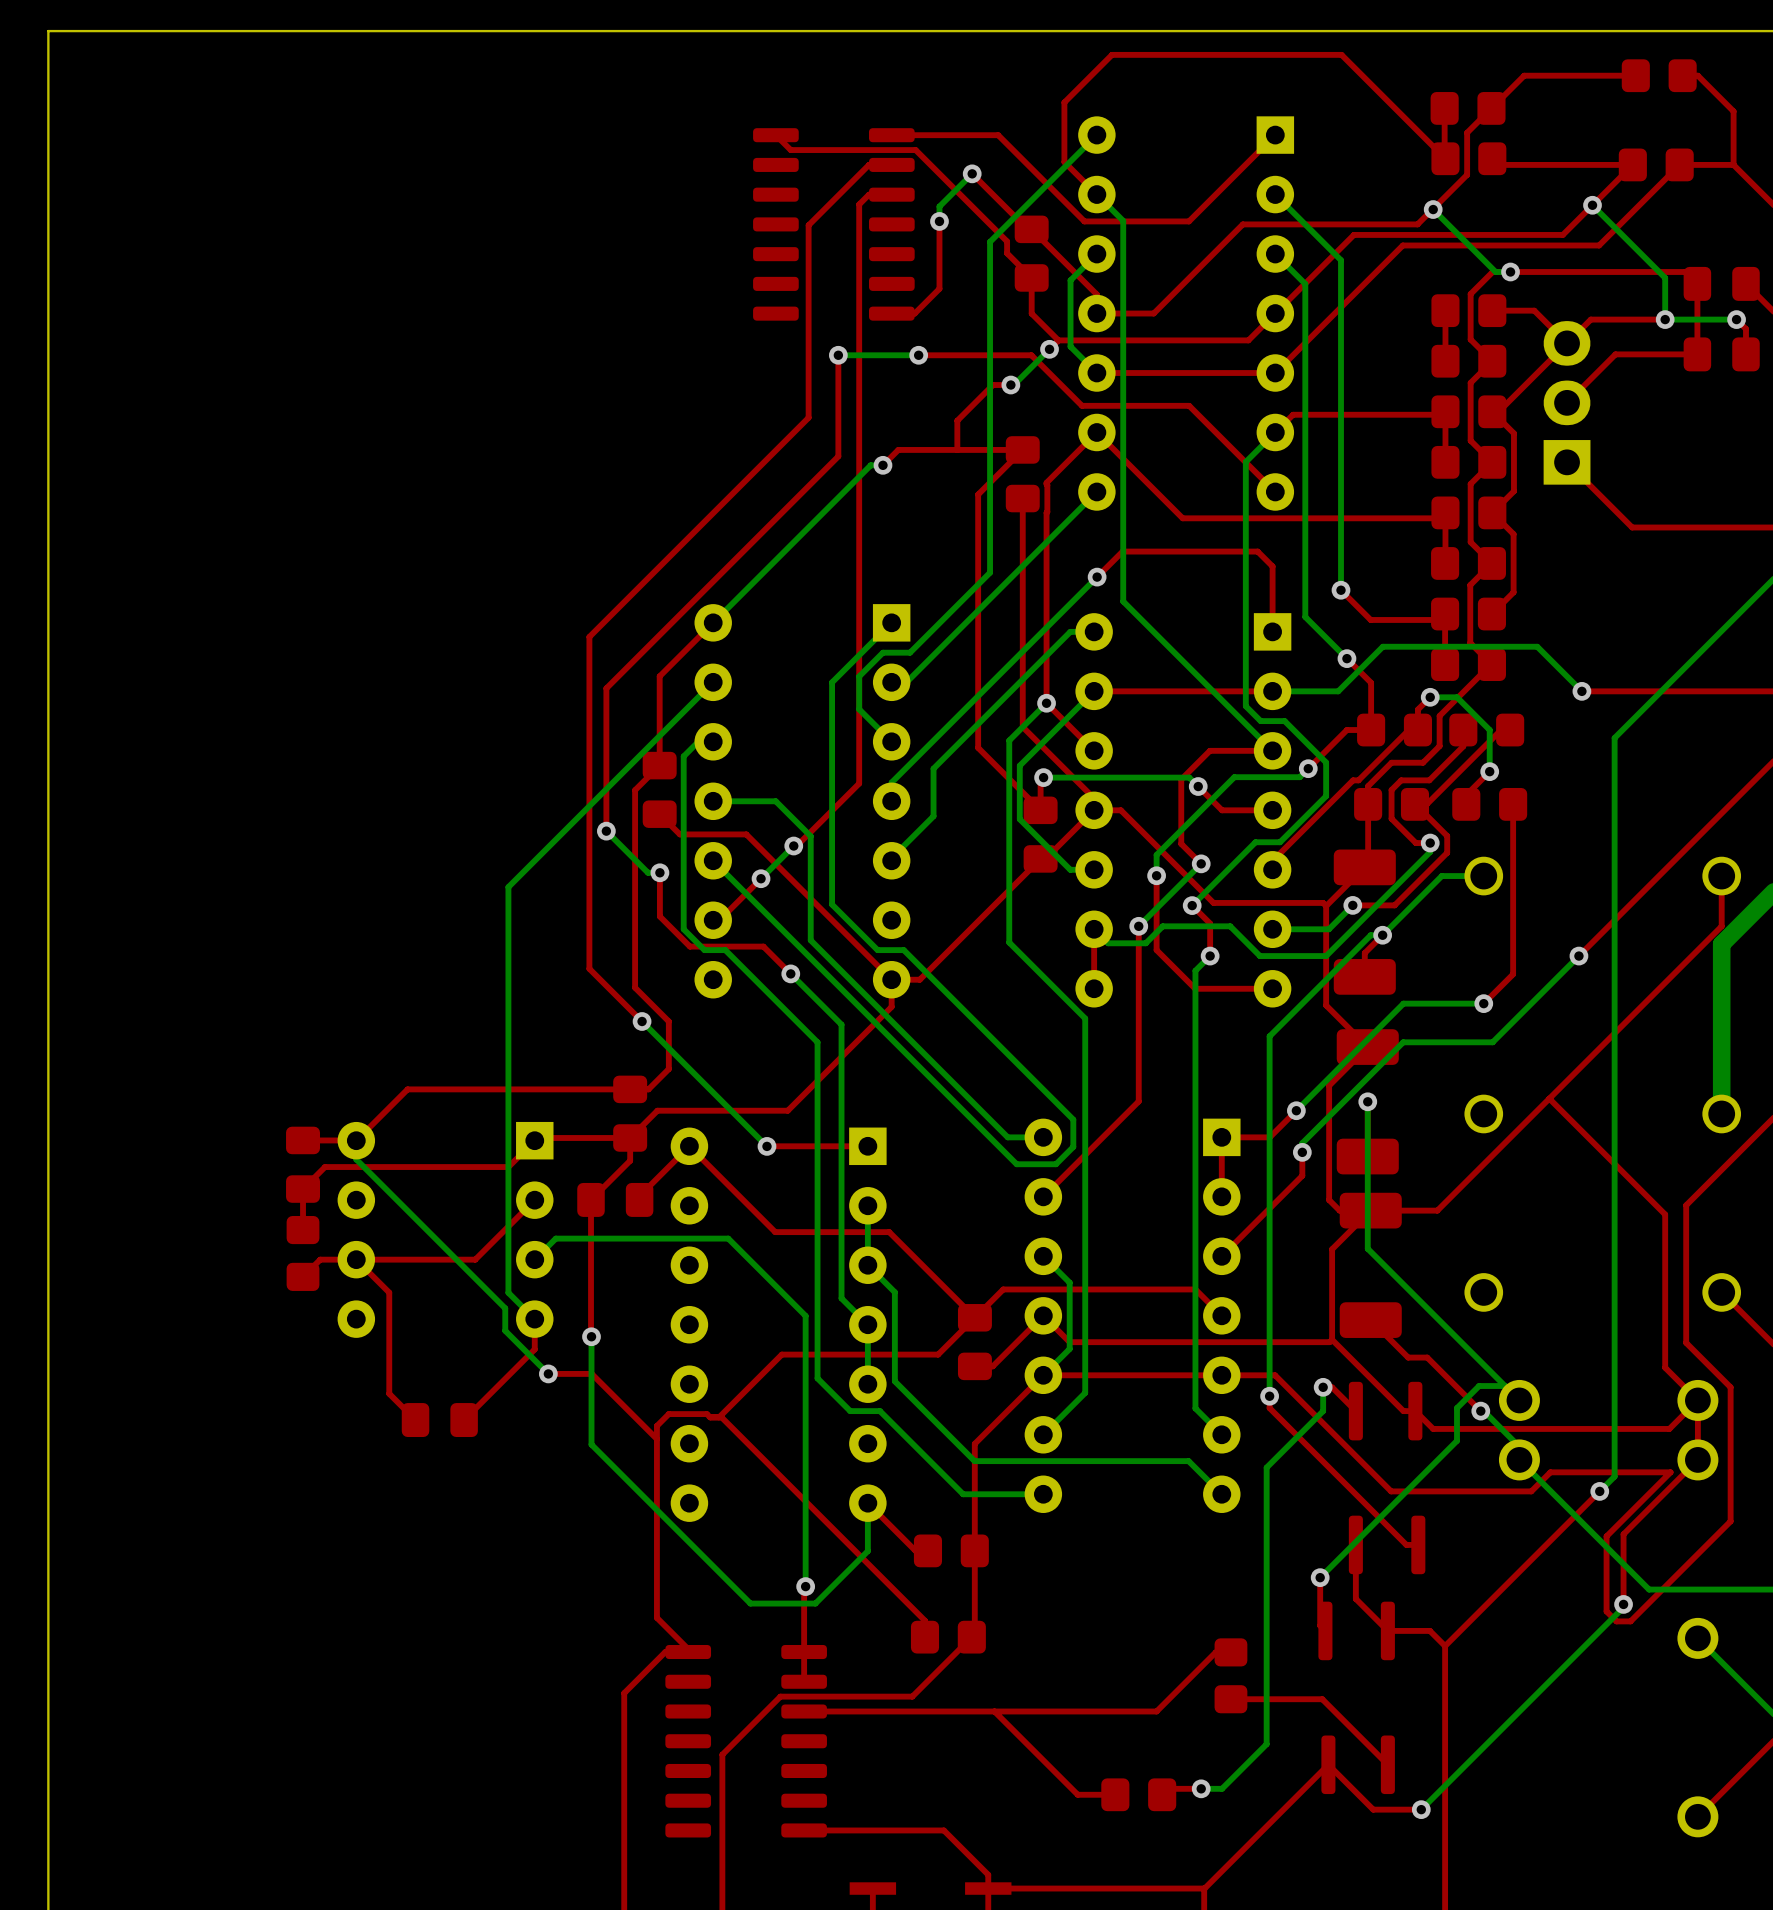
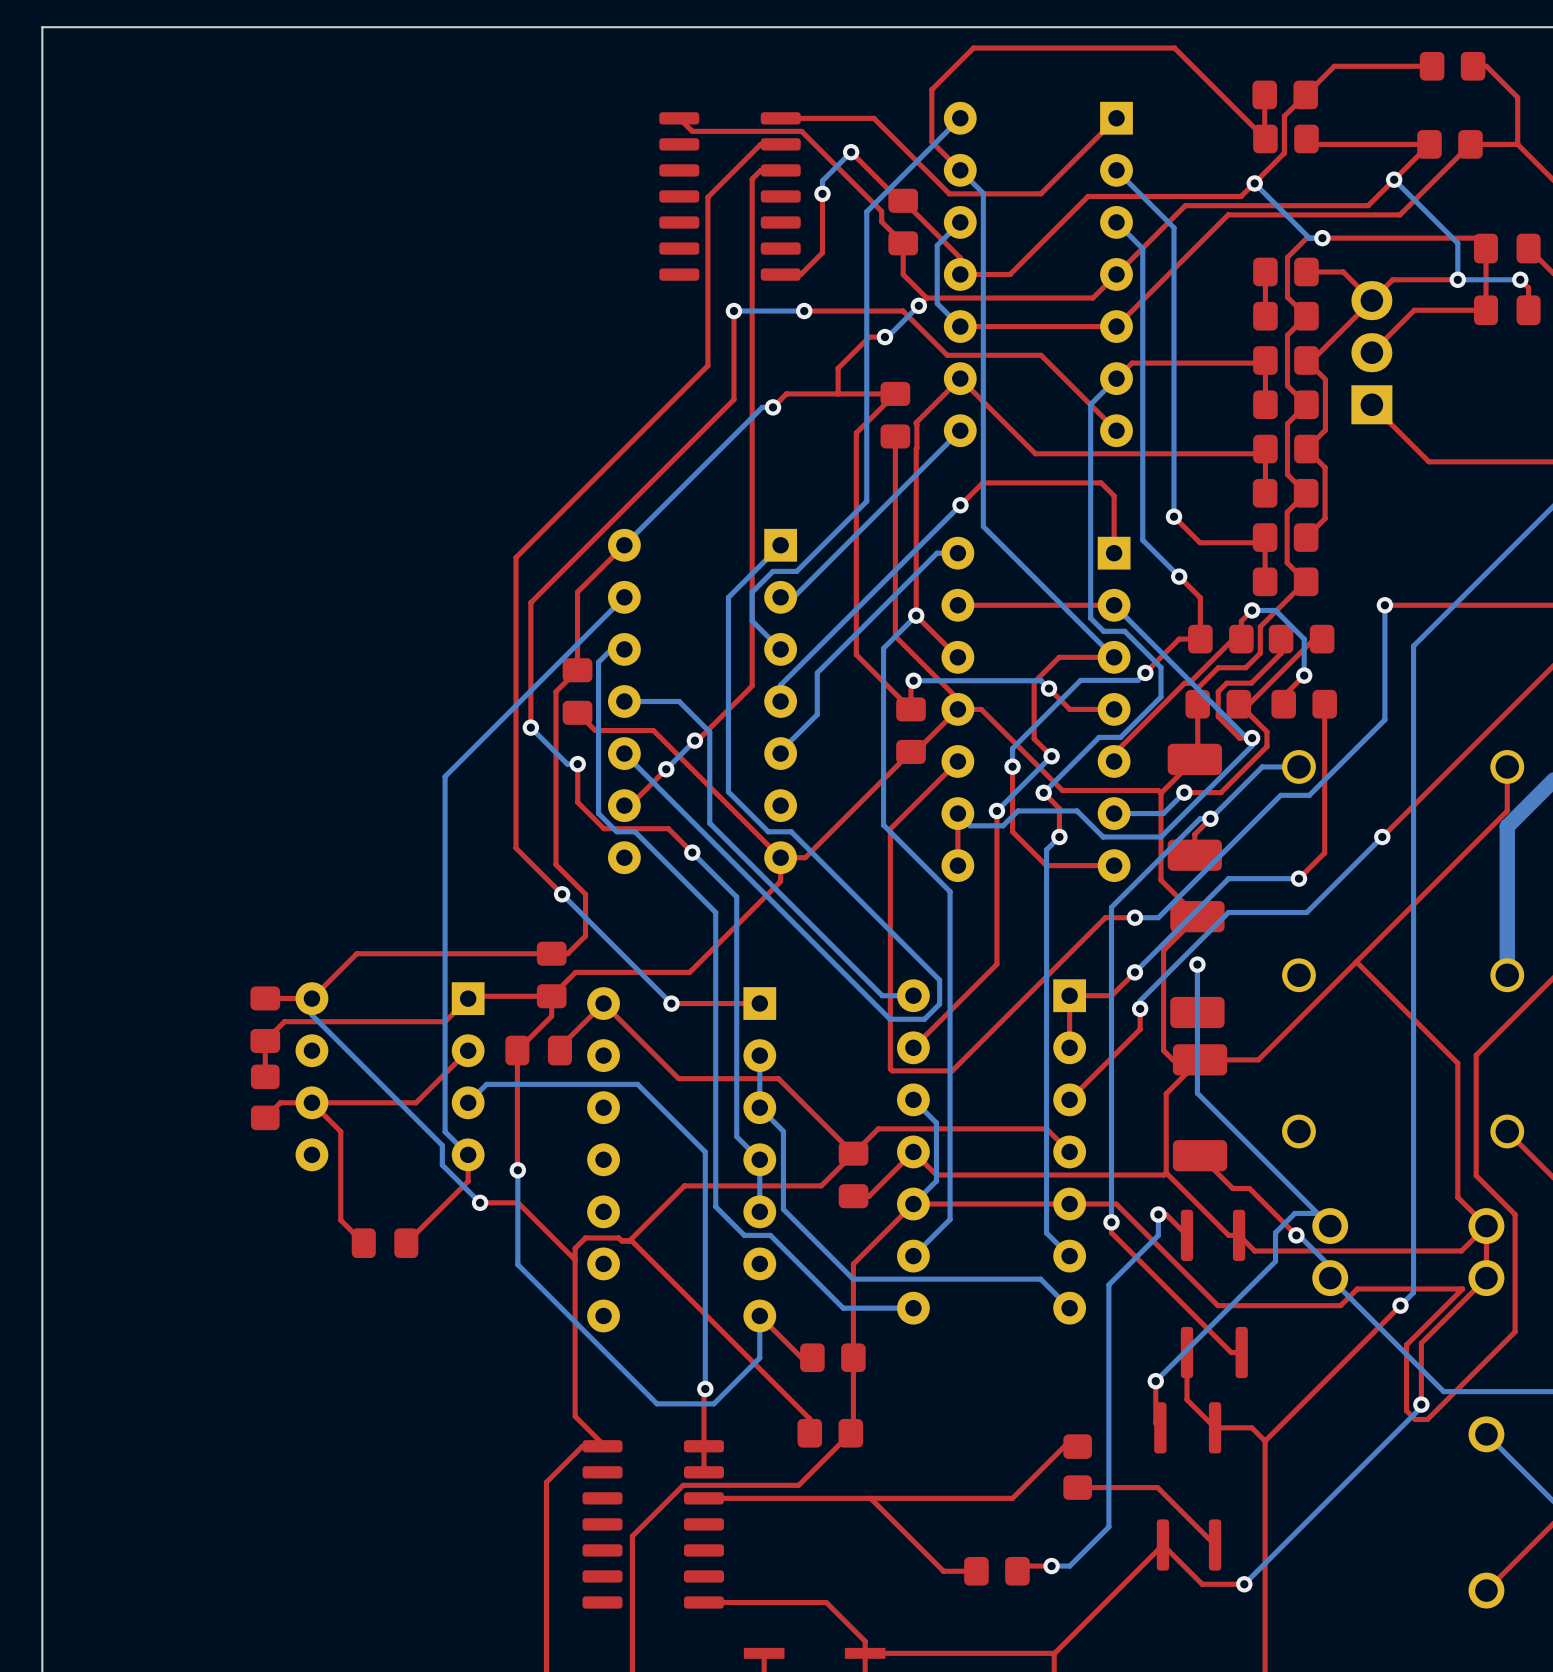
bottom track: (1094, 691) (1019, 765) (1019, 819) (1070, 869) (1094, 869) -> none
bottom track: (1581, 691) (1537, 646) (1382, 646) (1338, 691) (1272, 691) -> (1252, 738) (1246, 738) (1114, 605)
bottom track: none -> (1384, 605) (1384, 719) (1309, 795) (1280, 795) (1158, 917) (1134, 917)
top track: none -> (957, 761) (890, 829) (890, 1068) (892, 1070) (952, 1070) (1105, 917) (1134, 917)
via: none -> (1134, 917)

